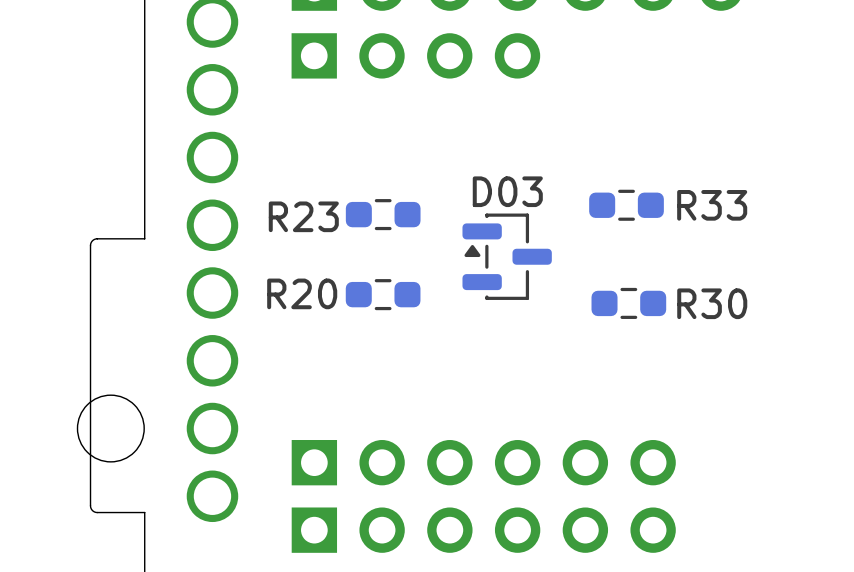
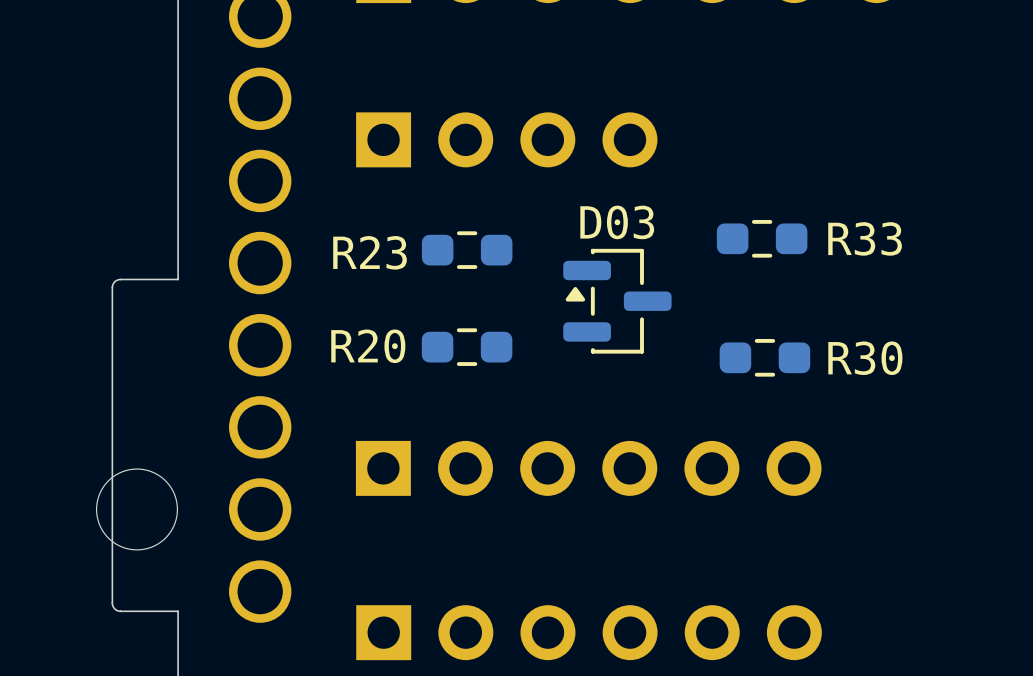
part position: (415, 55) -> (506, 139)
part position: (483, 462) -> (588, 468)

